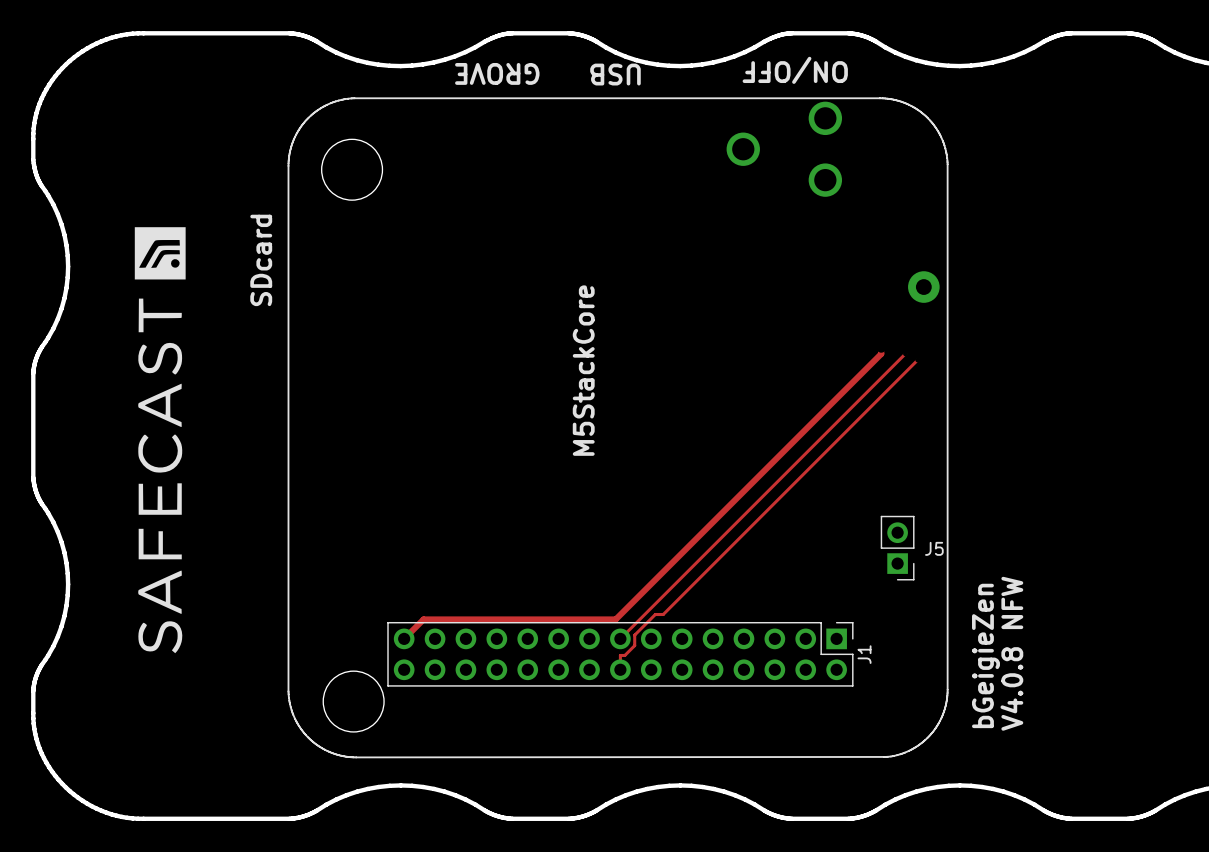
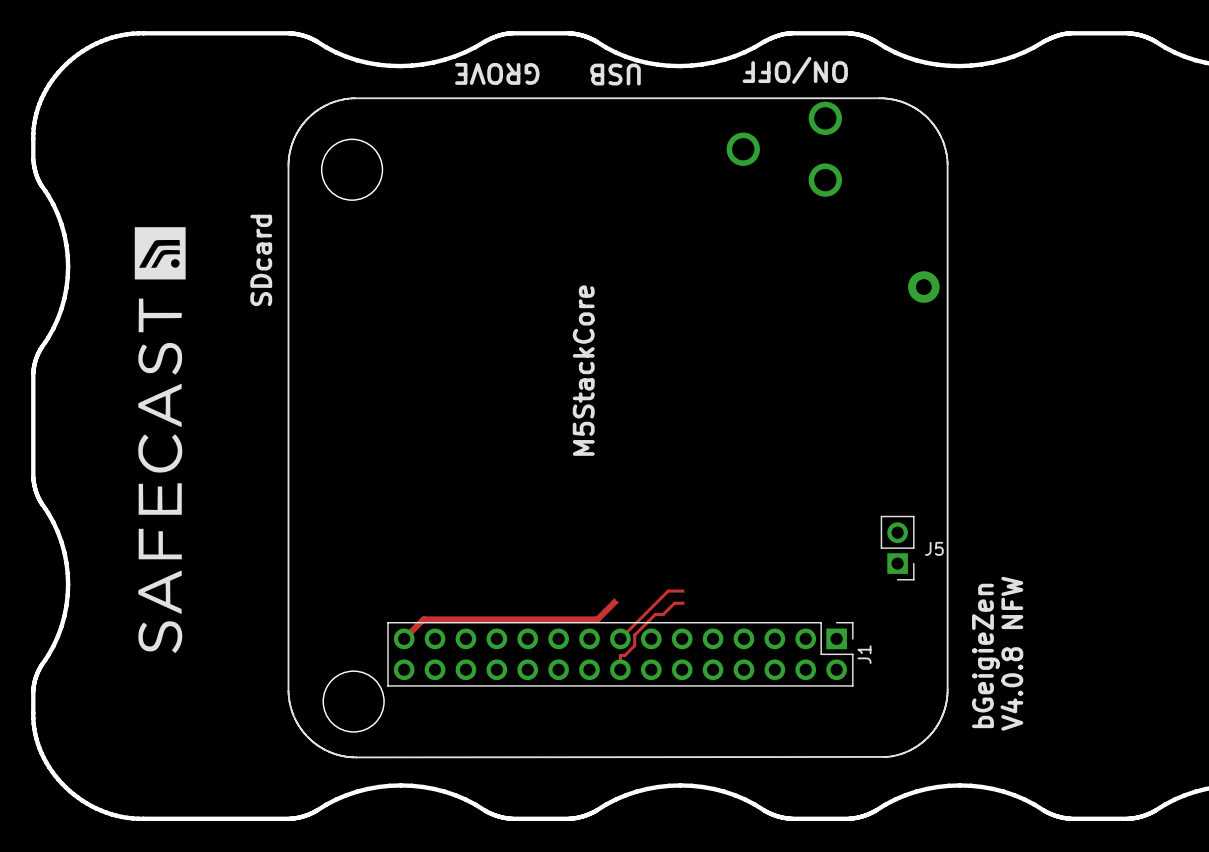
track: (881, 347) (881, 353) (615, 619) (597, 619) -> (619, 597) (597, 619)
via: (881, 347) -> none
track: (905, 353) (668, 591) -> (686, 591) (668, 591)
via: (905, 353) -> none
track: (917, 360) (674, 603) -> (686, 603) (674, 603)
via: (917, 360) -> none
via: none -> (686, 591)
via: none -> (619, 597)
via: none -> (686, 603)

